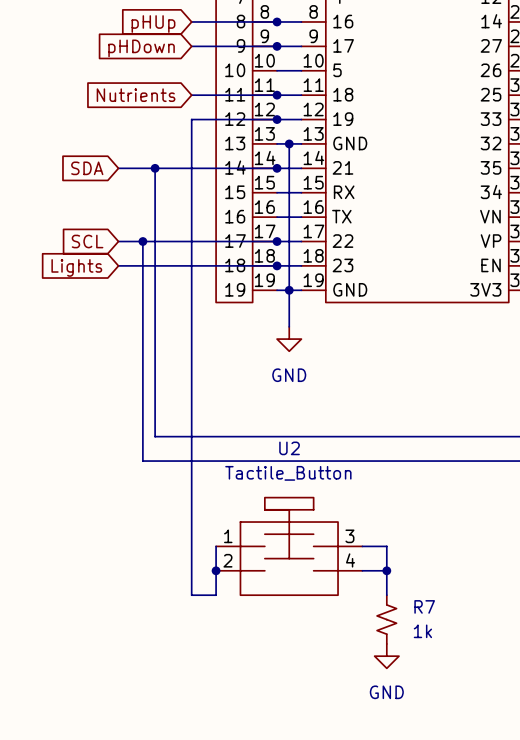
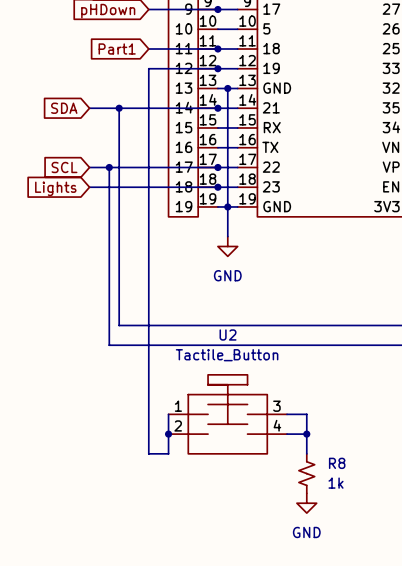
global label: Nutrients (136, 95) -> Part1 (117, 48)
R7 name: R7 (424, 606) -> R8 (337, 463)

